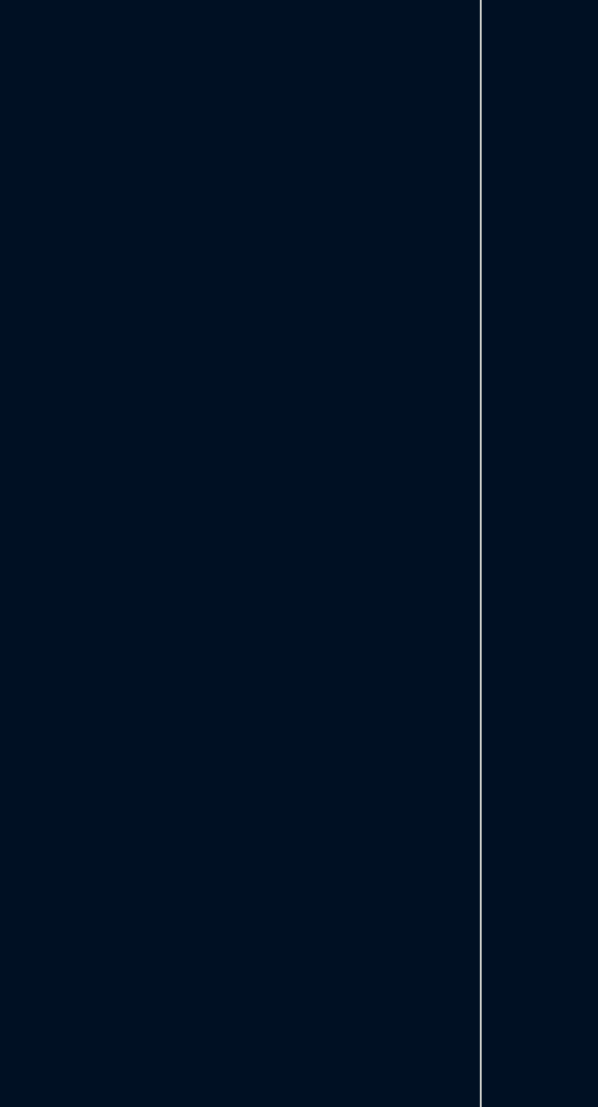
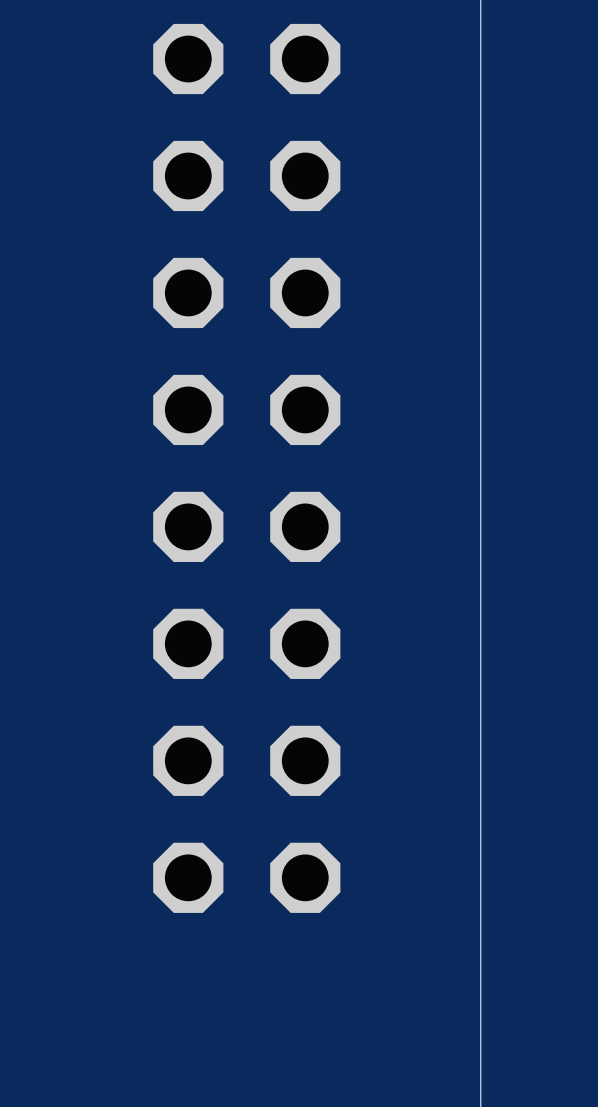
part: none -> (246, 468)

